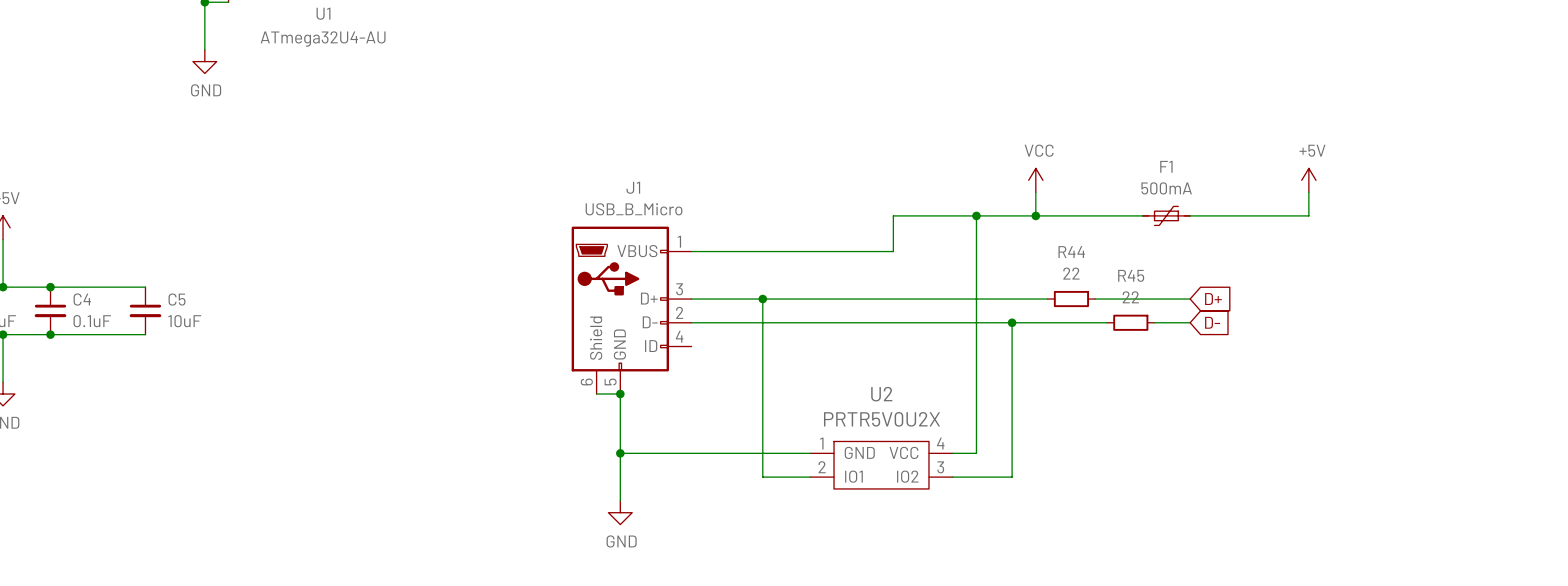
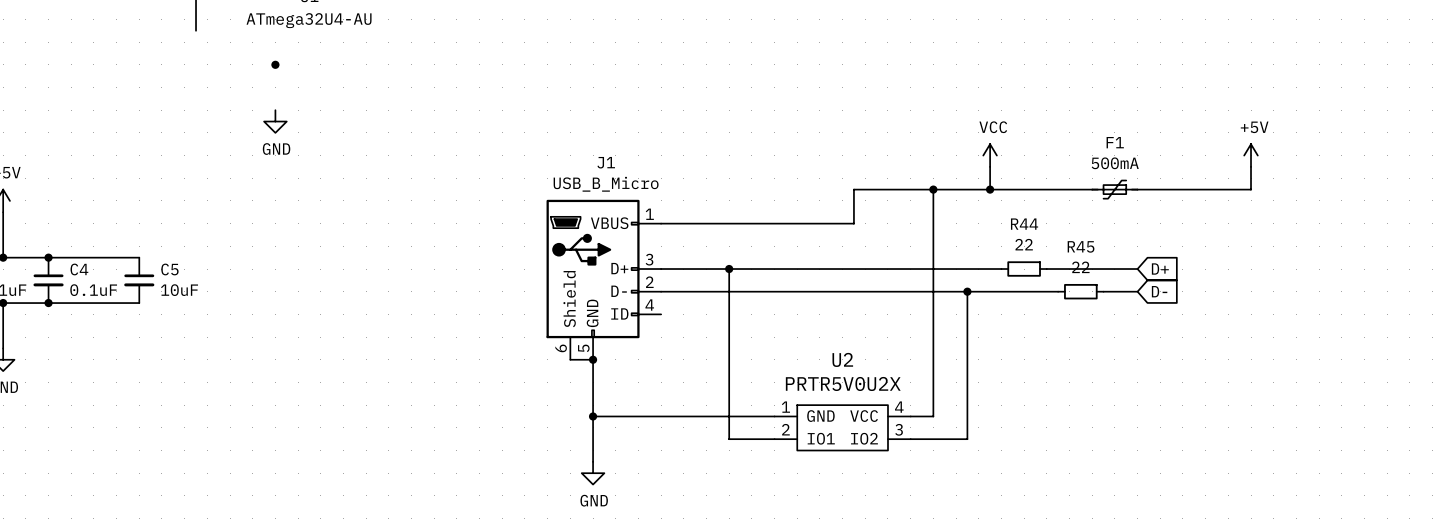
power symbol position: GND (204, 61) -> GND (275, 121)
junction: none -> (275, 64)

